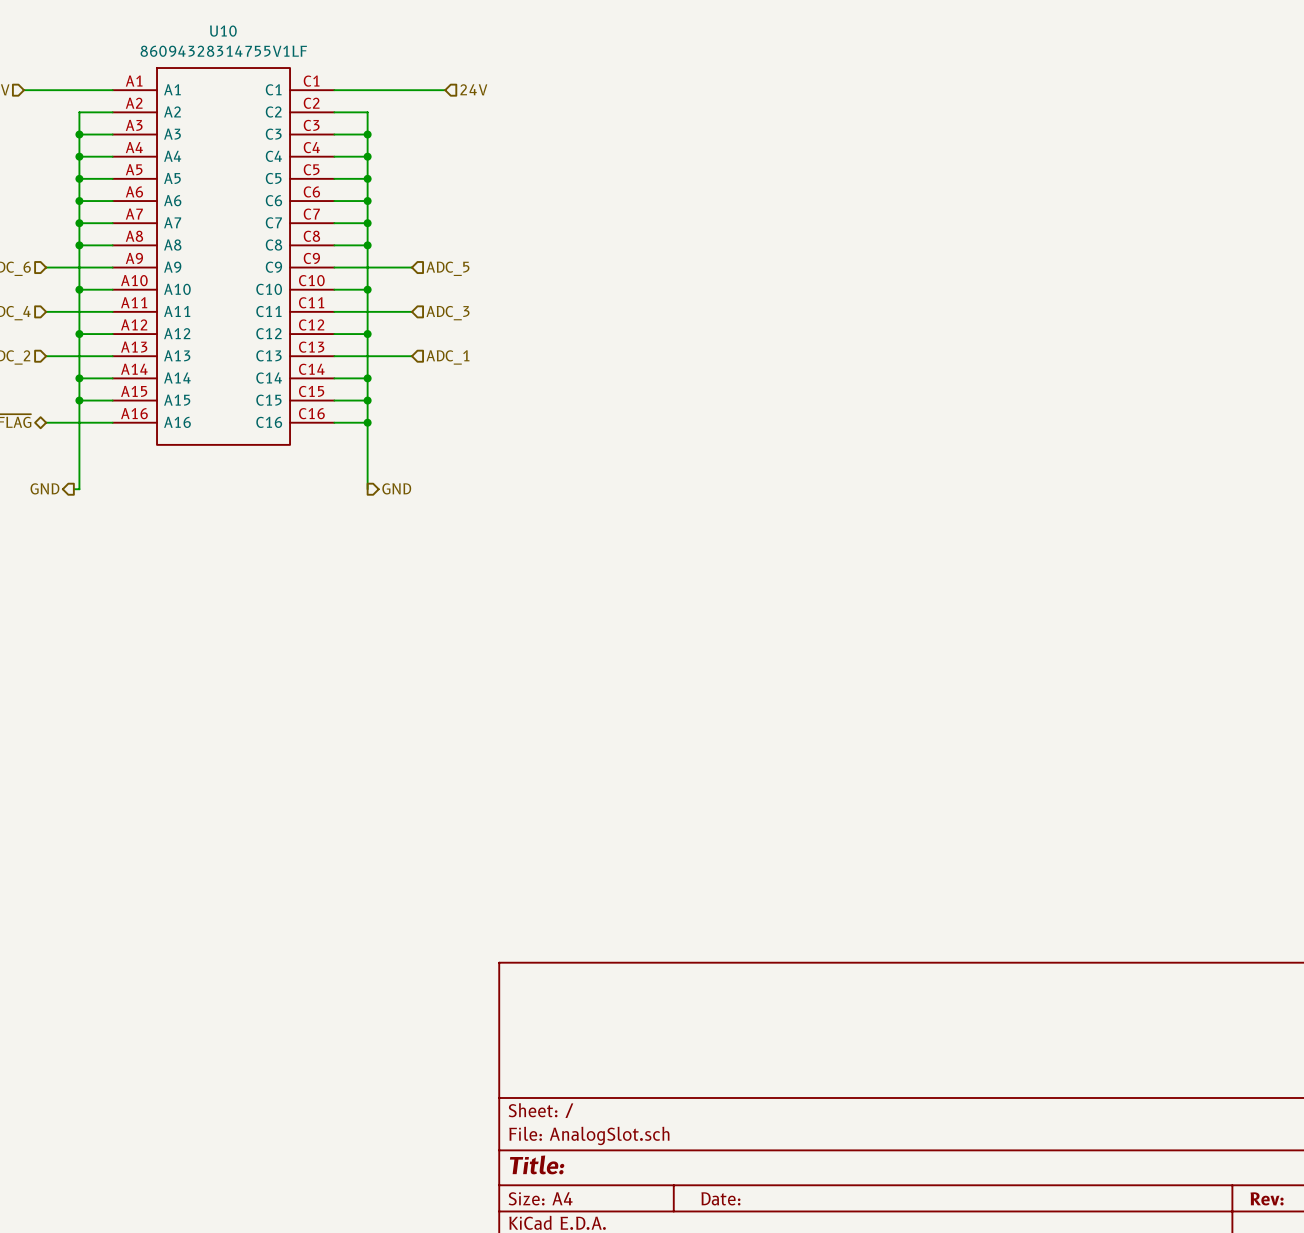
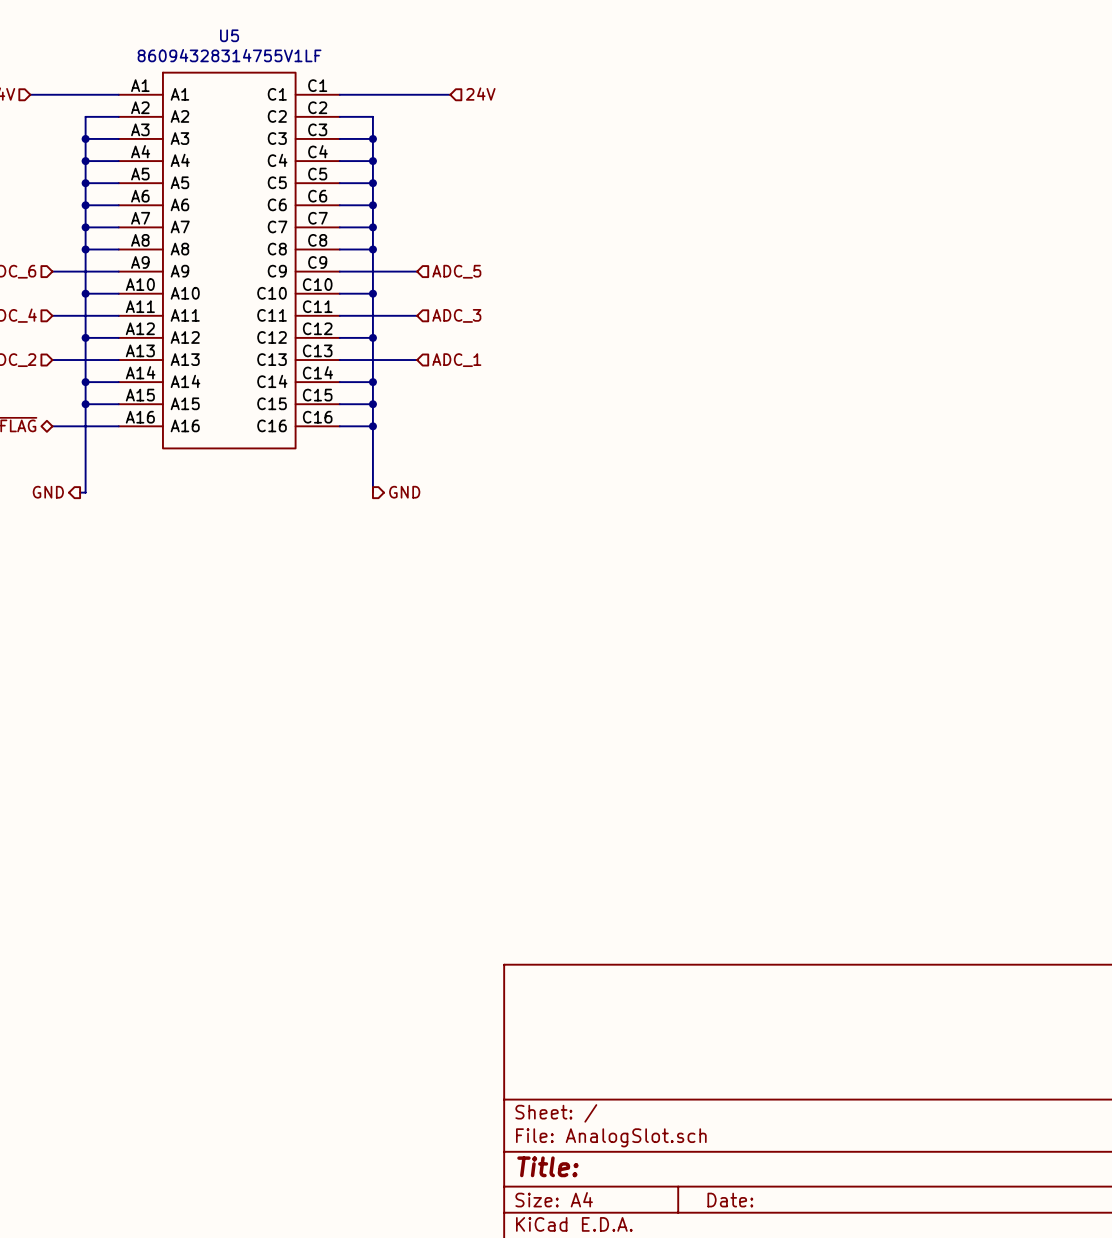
U10 name: U10 (223, 31) -> U5 (229, 35)

